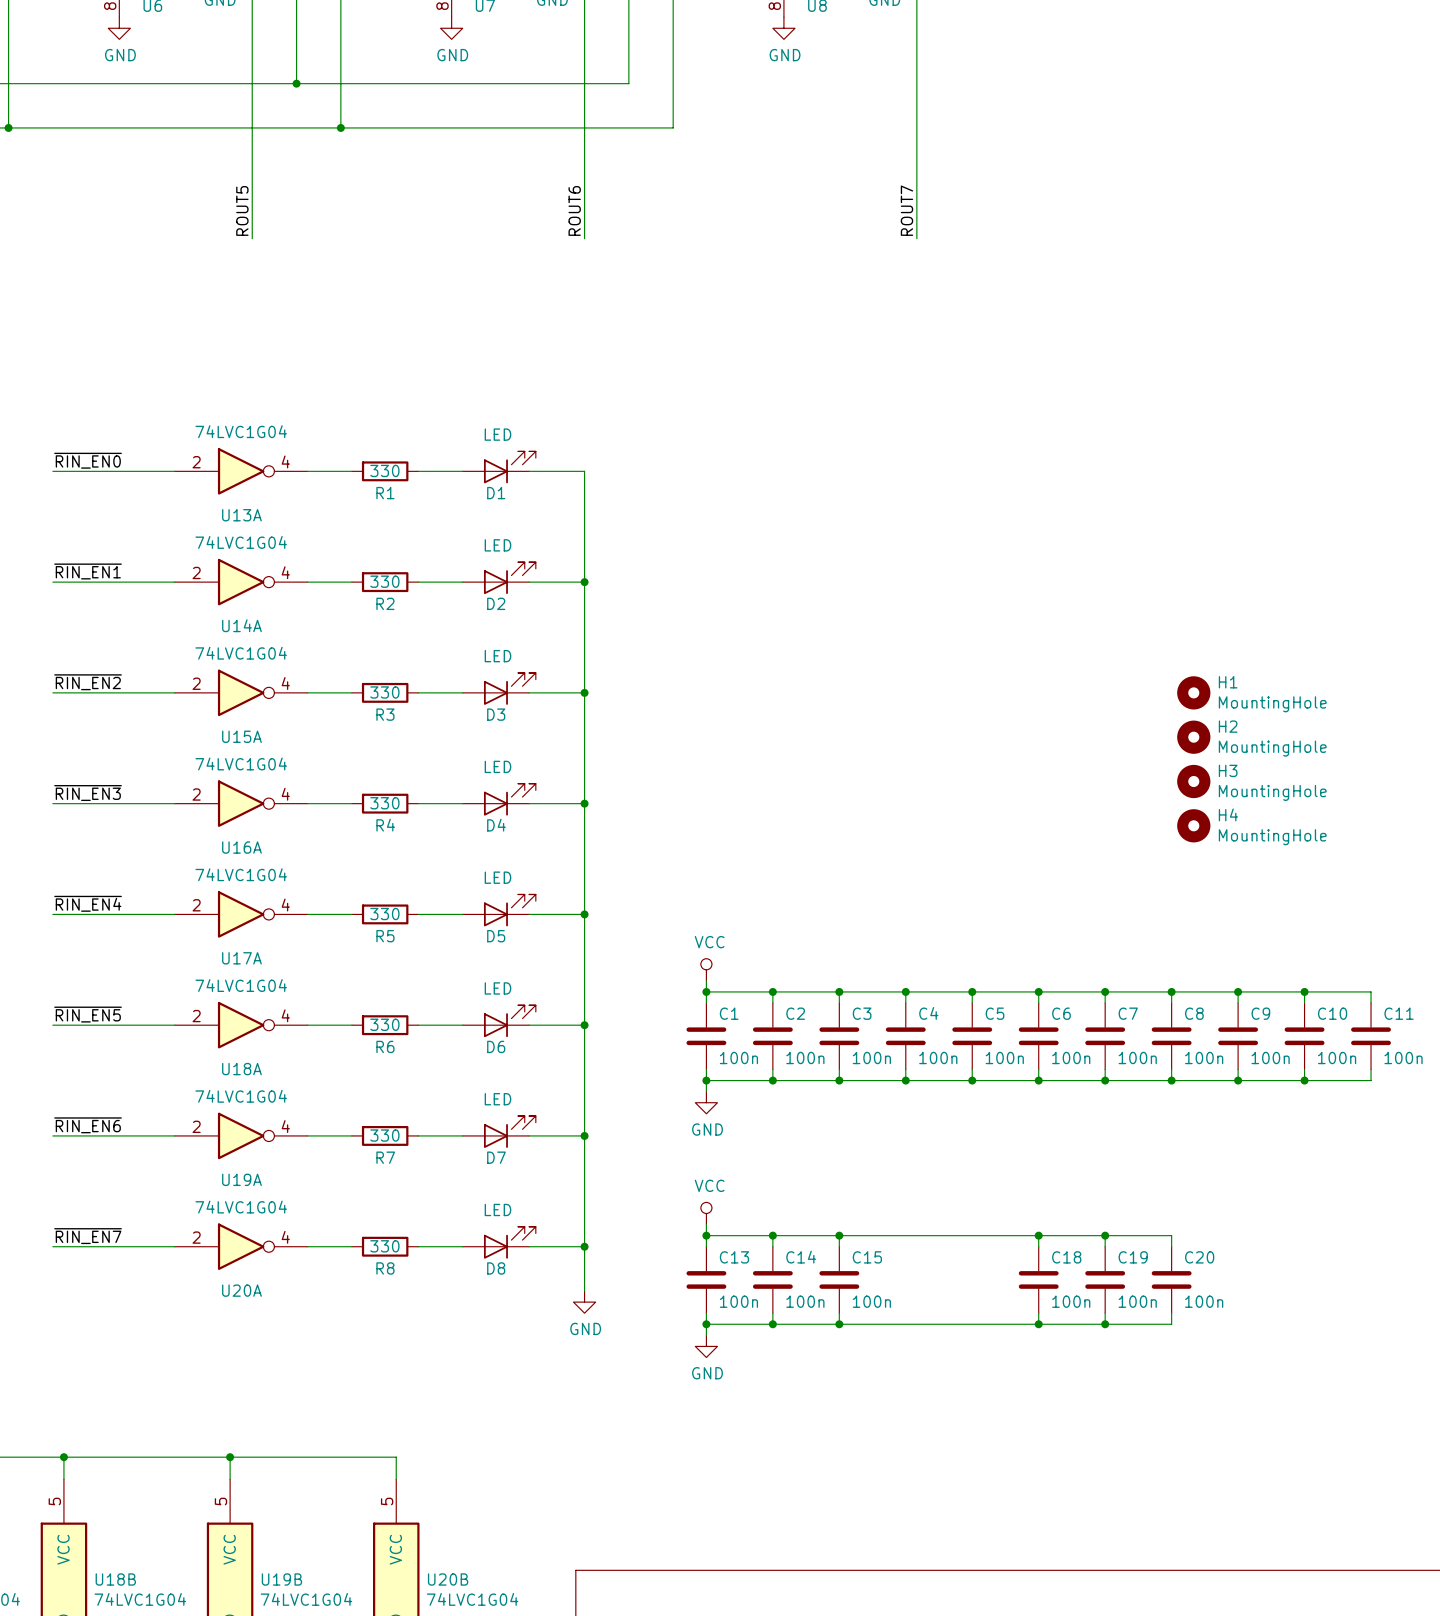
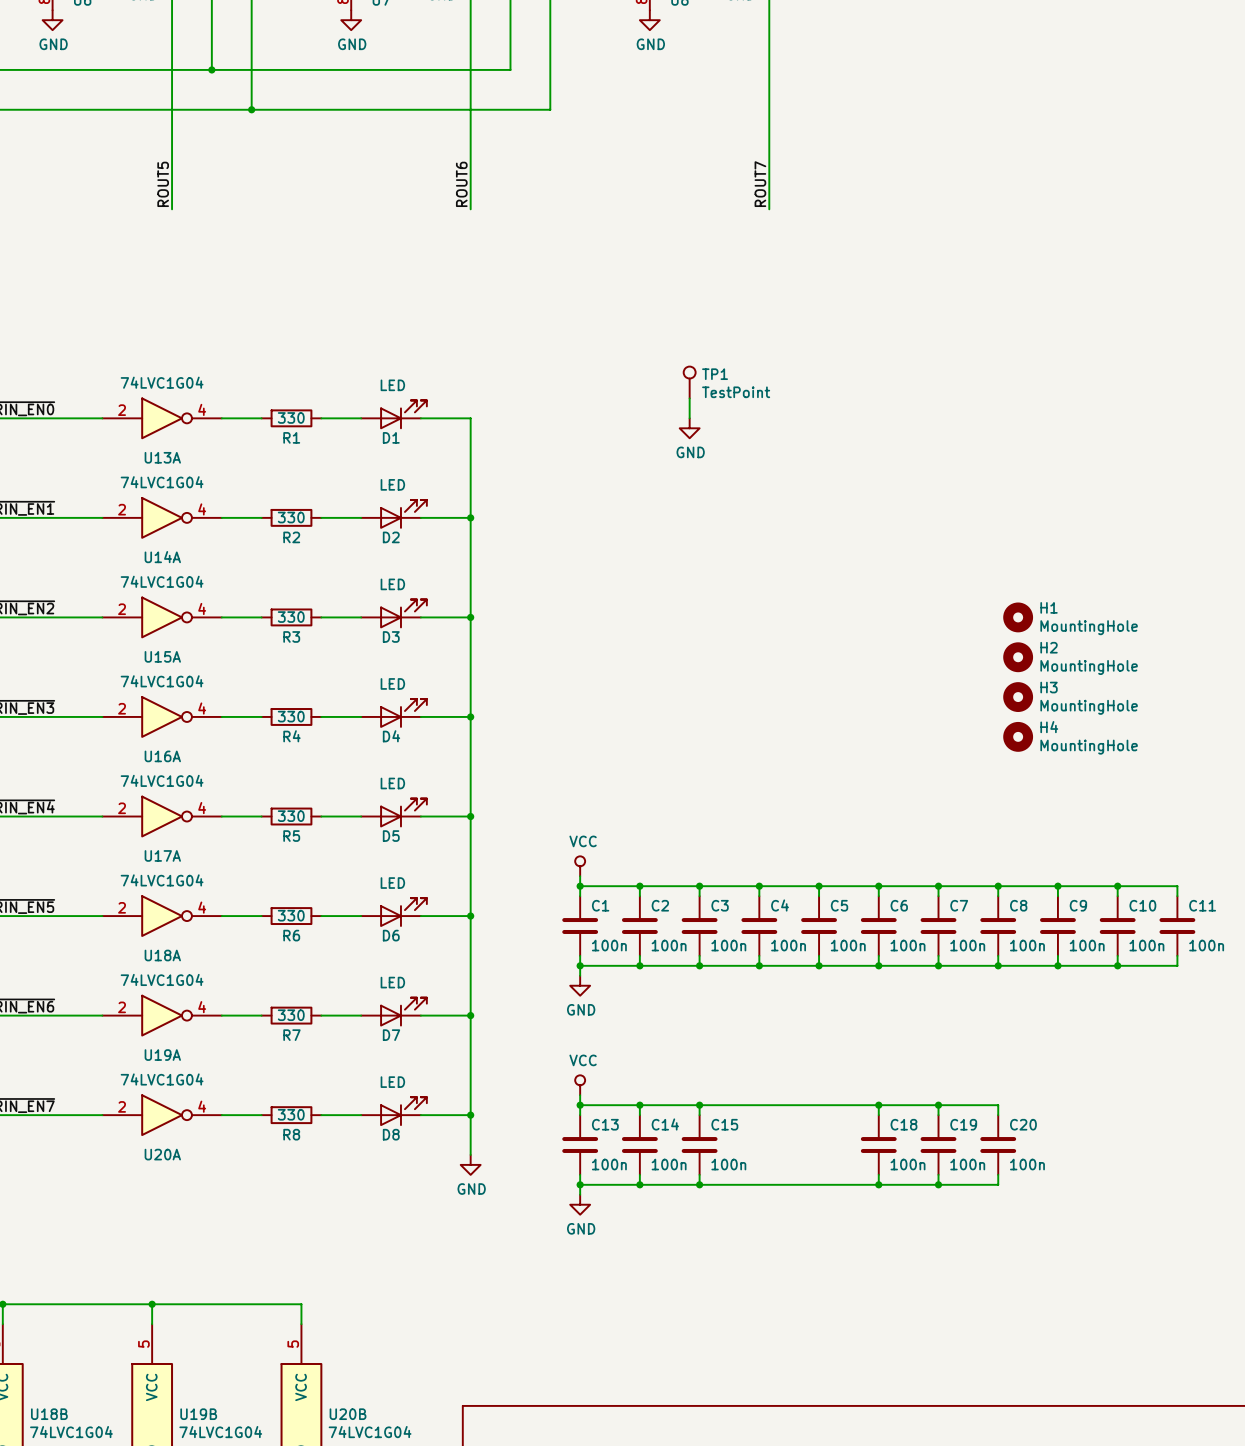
TP1: none -> TestPoint (689, 382)
wire: none -> (689, 398) (689, 418)
power symbol: none -> GND (689, 428)

